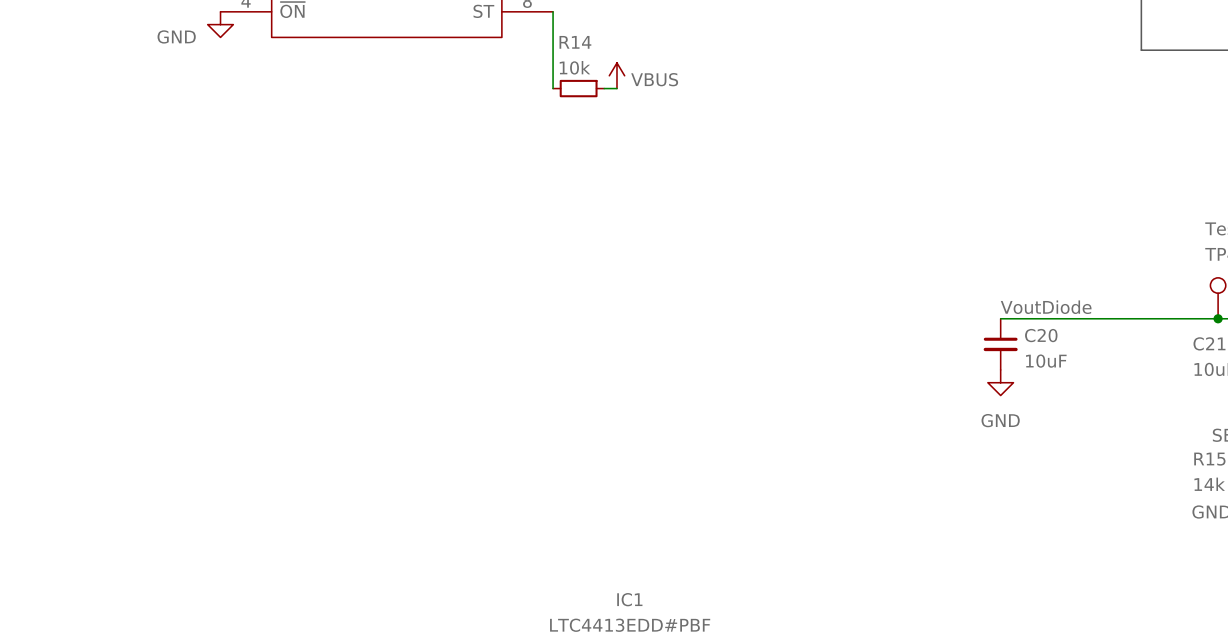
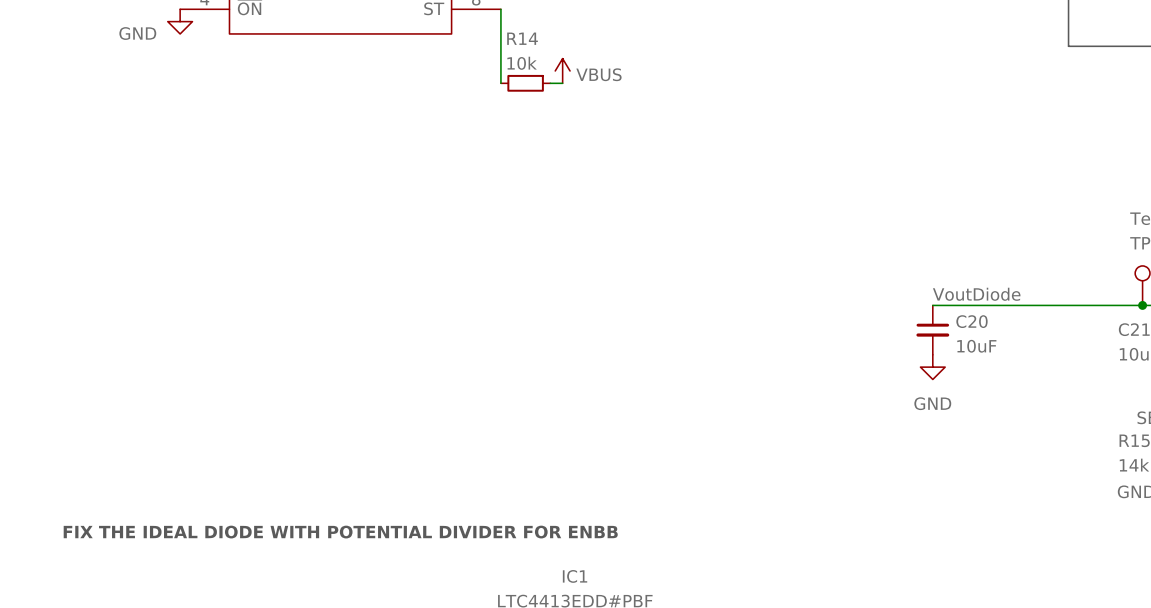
text: none -> FIX THE IDEAL DIODE WITH POTENTIAL DIVIDER FOR ENBB (340, 532)

